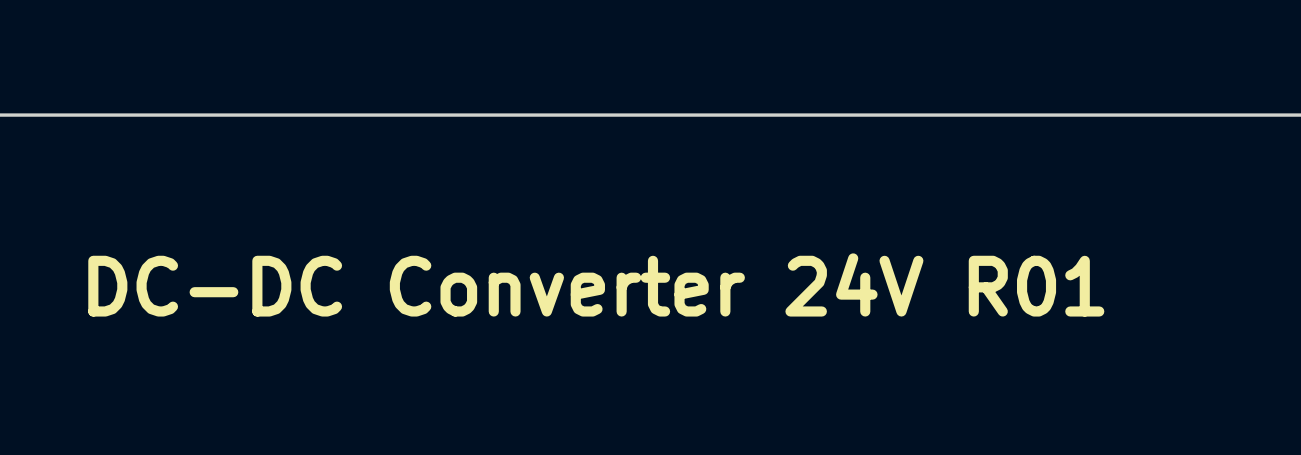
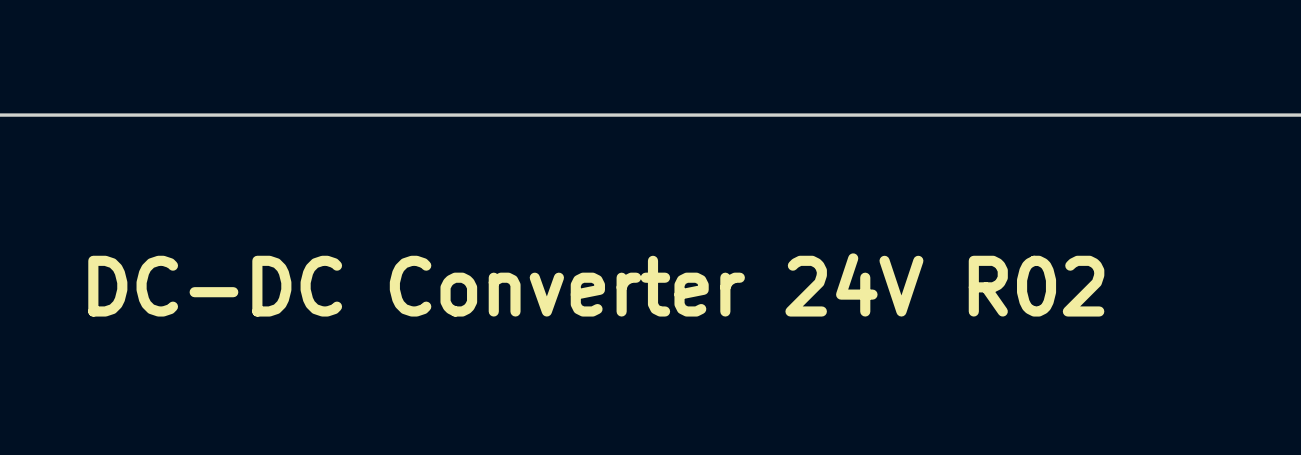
text: DC-DC Converter 24V R01 (596, 284) -> DC-DC Converter 24V R02 (596, 284)

